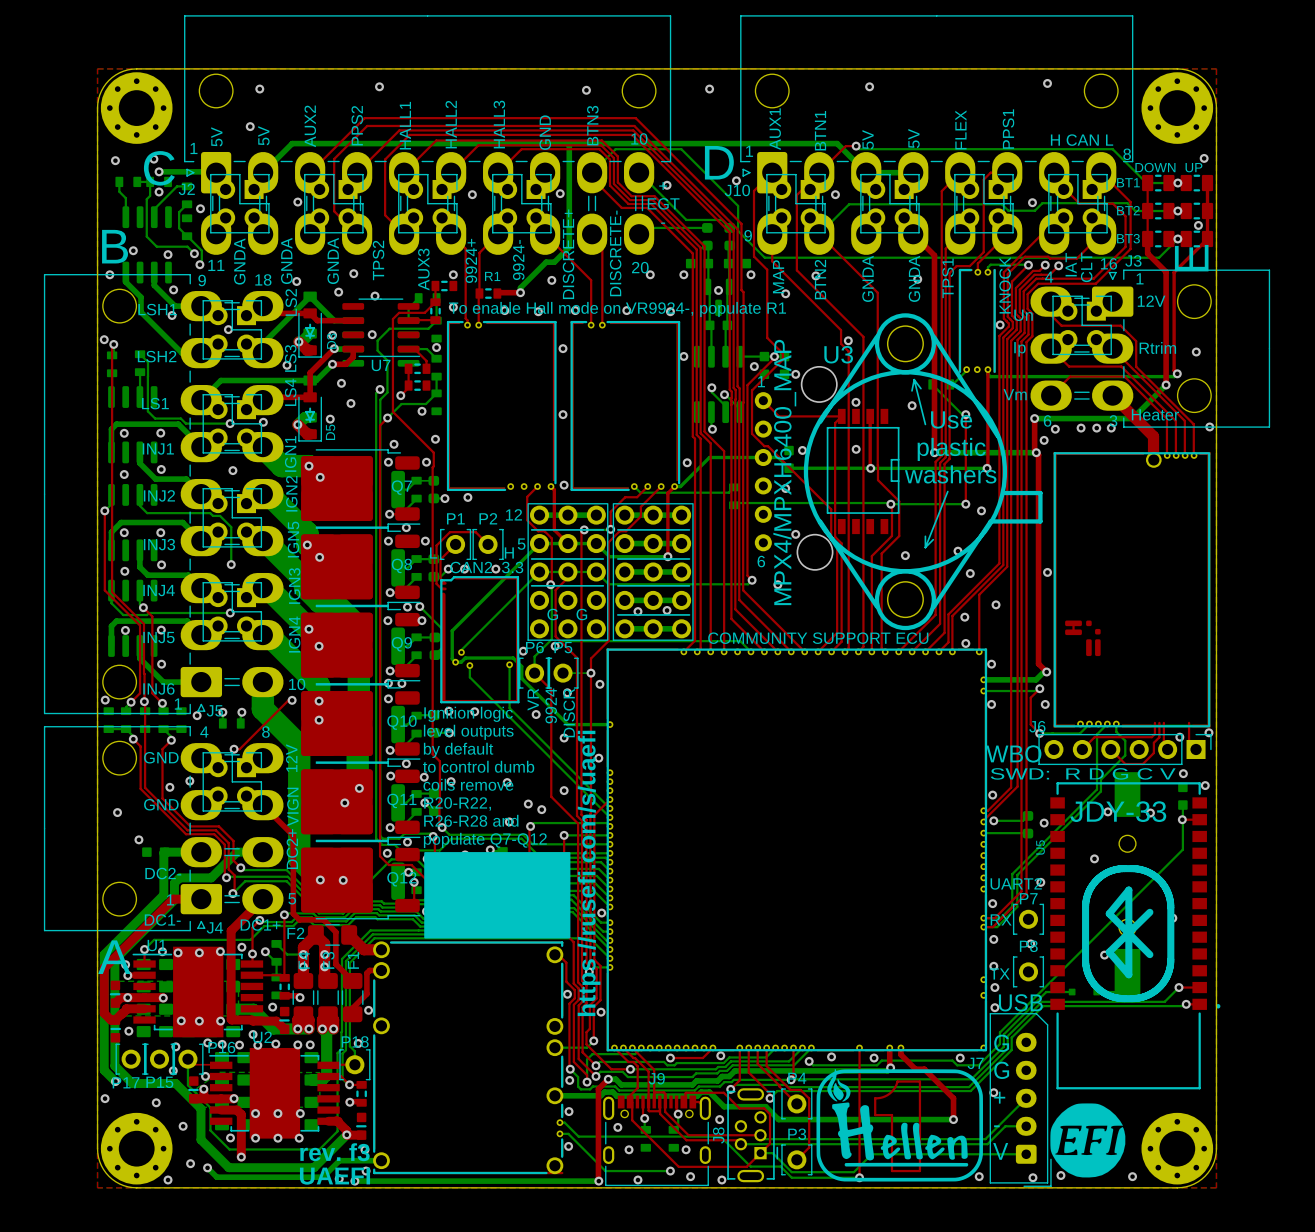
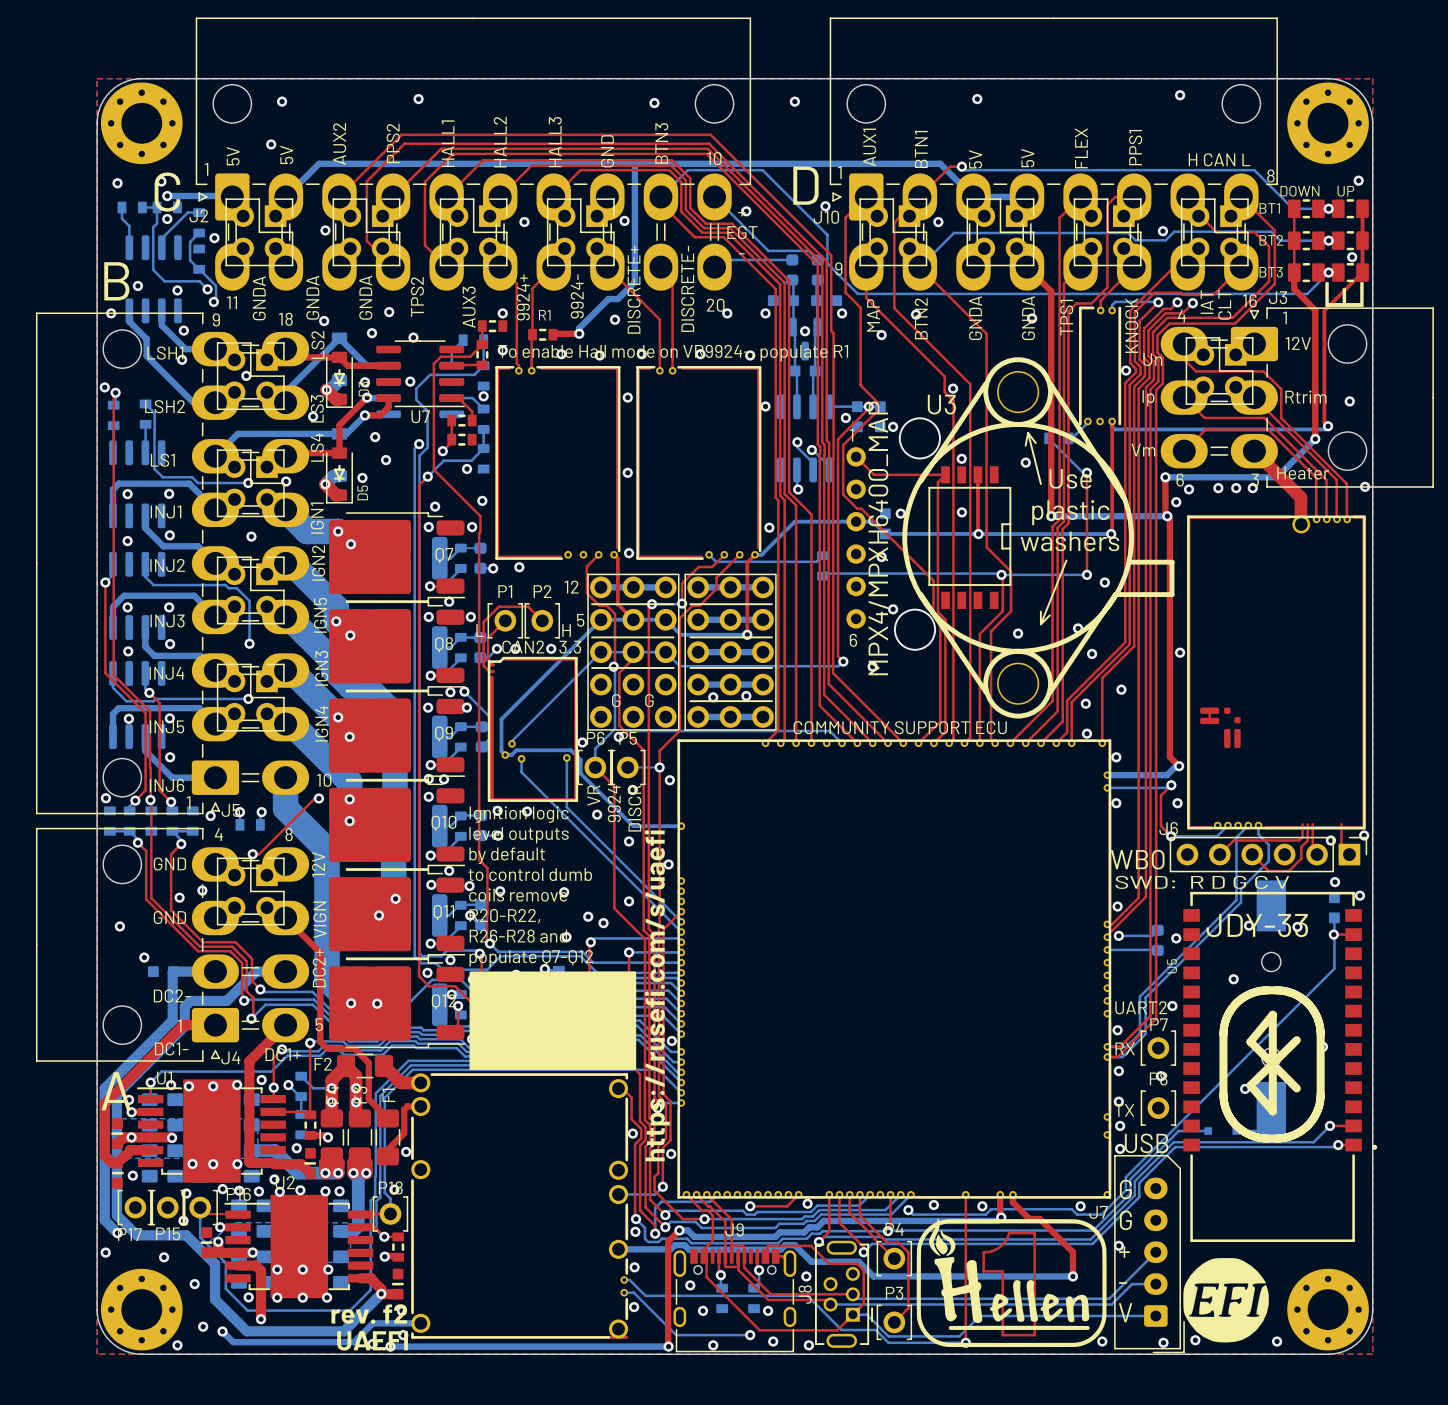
text: rev. f3 (334, 1152) -> rev. f2 (369, 1314)

